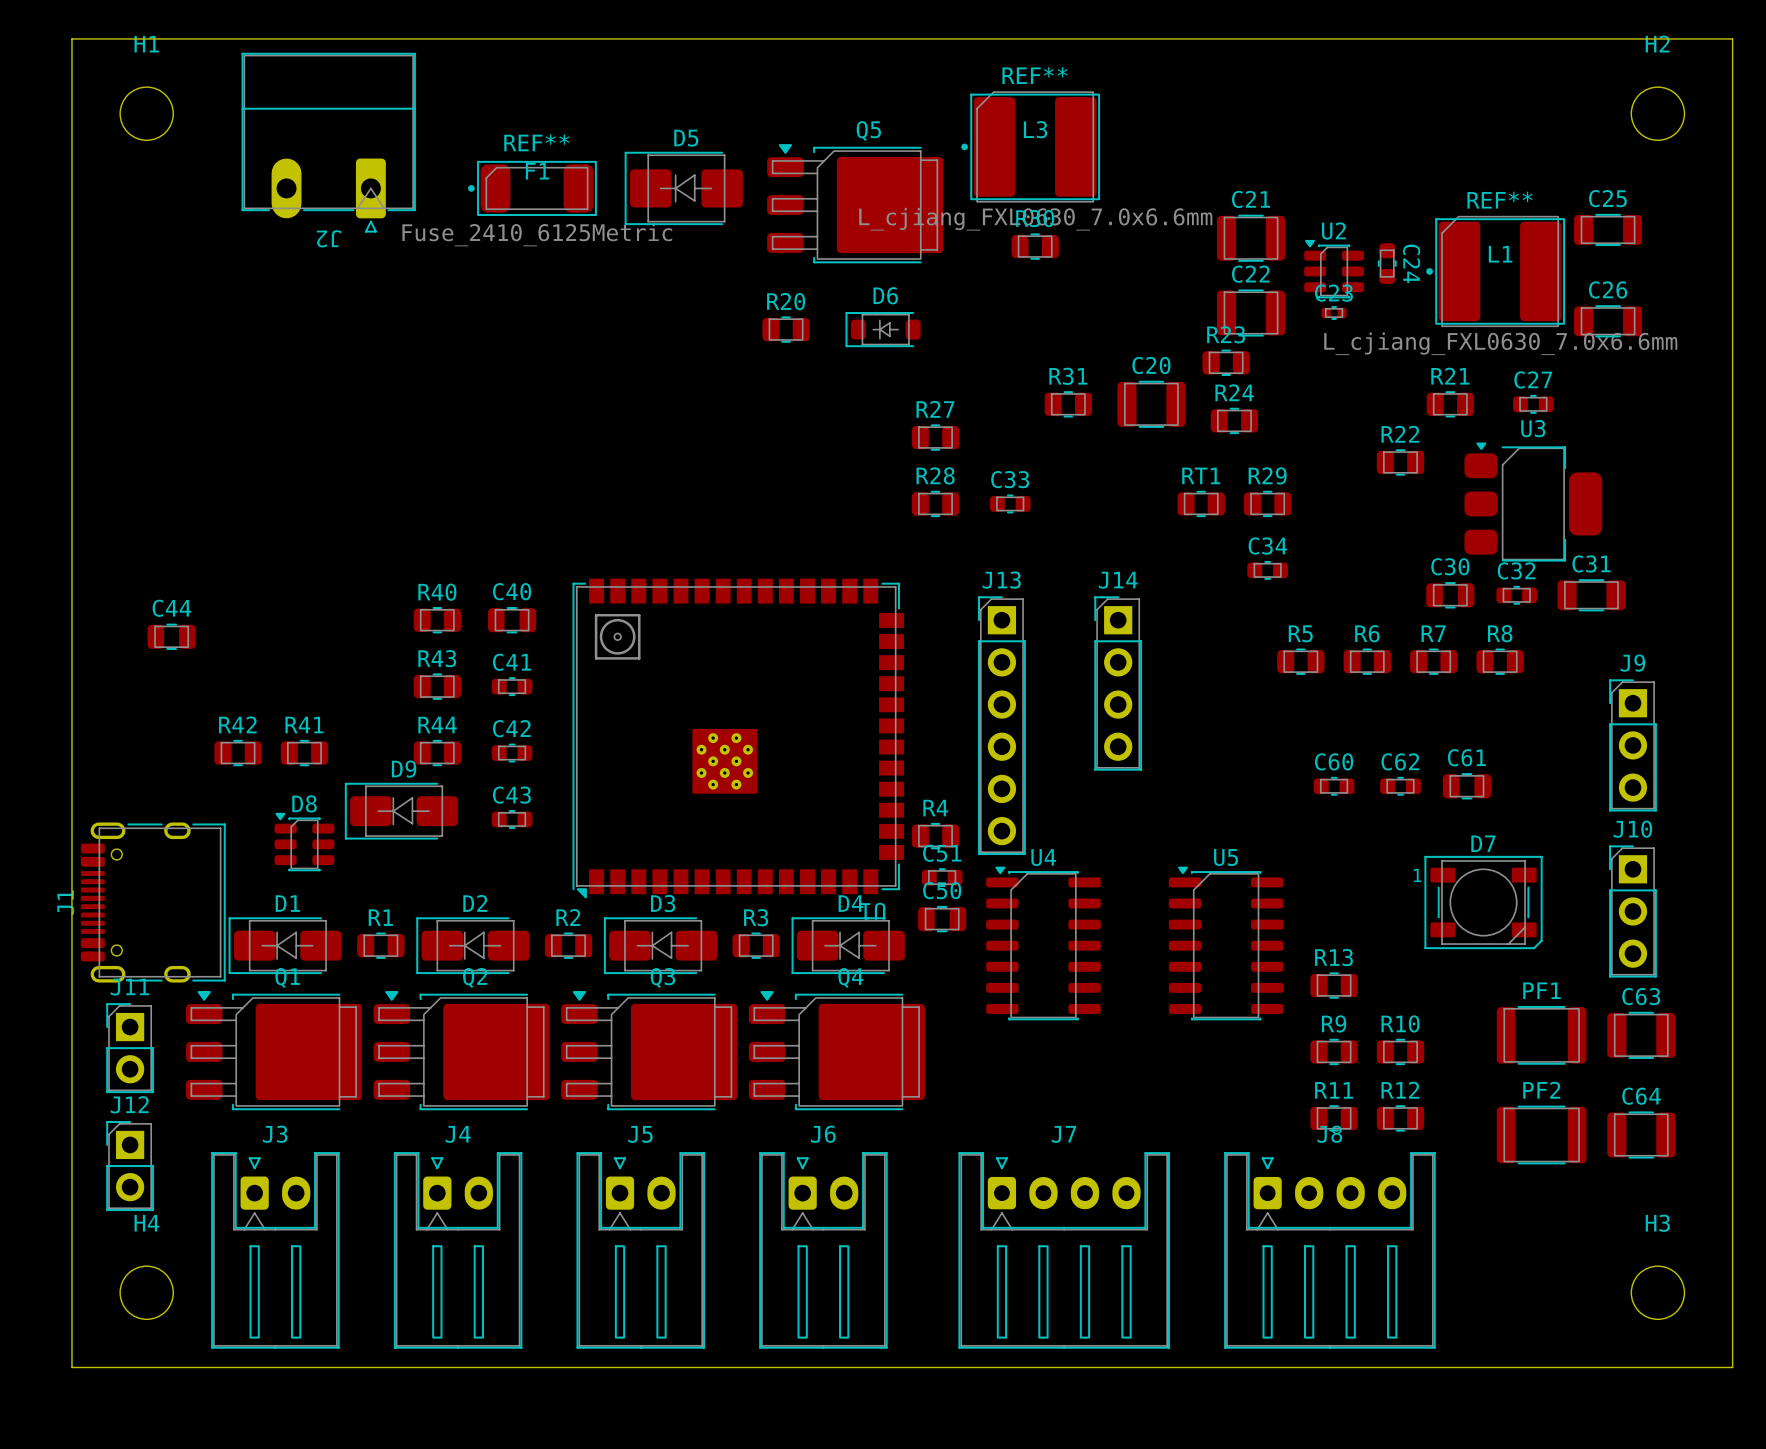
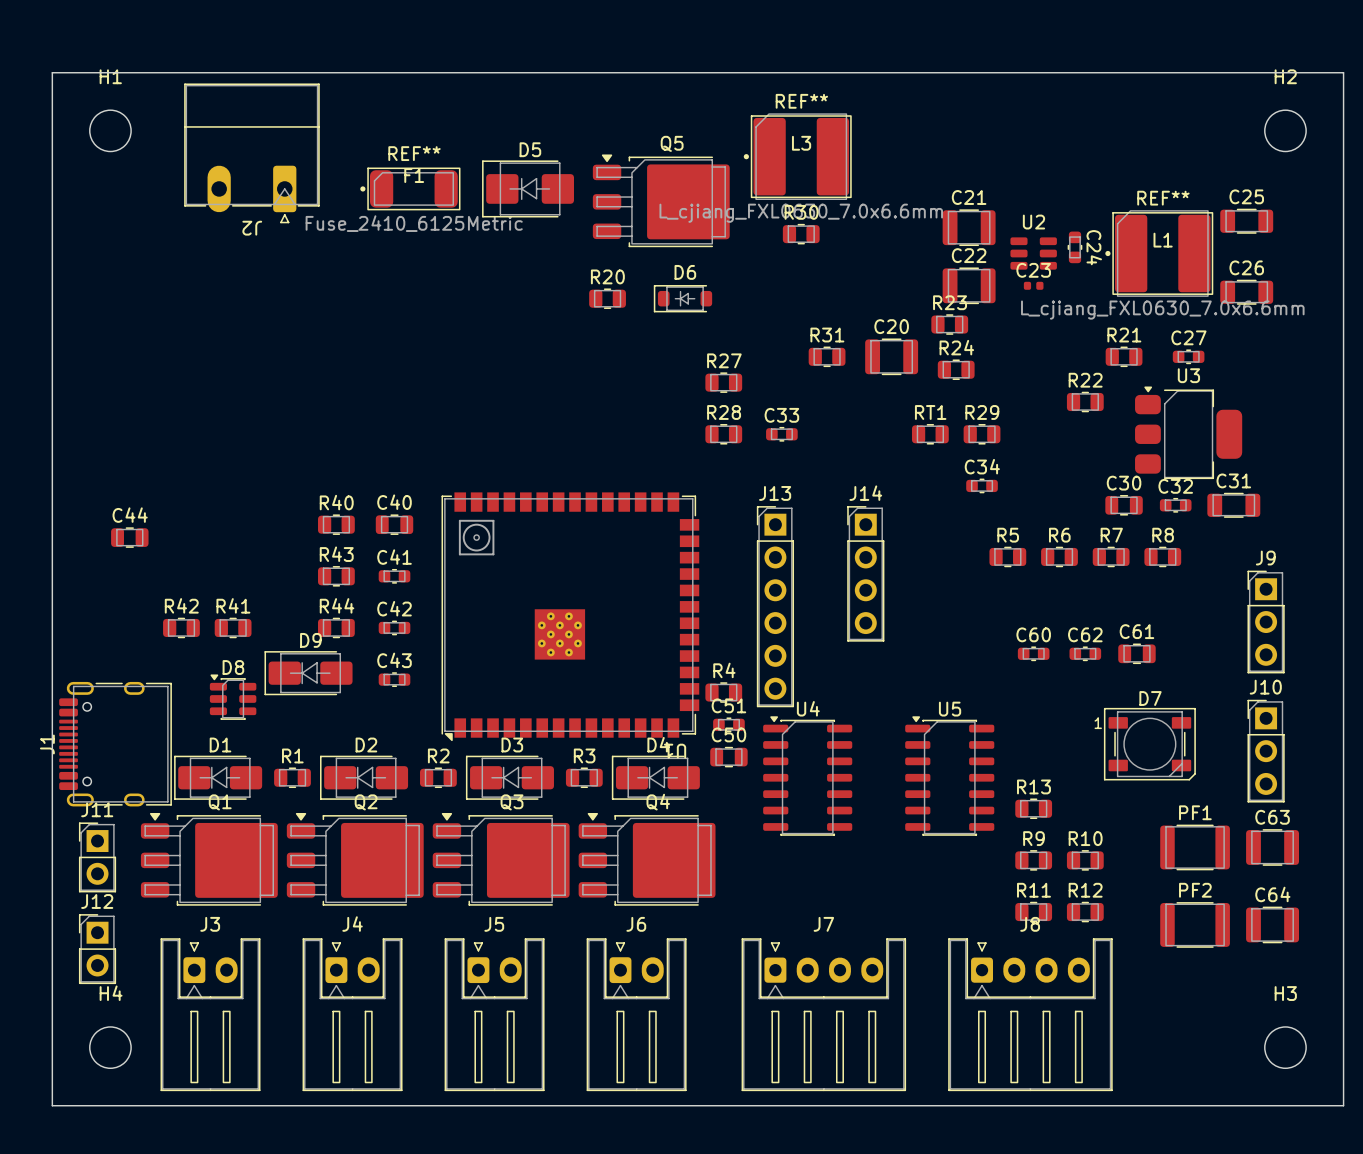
U2 footprint: [1304, 239, 1364, 299] -> [1010, 237, 1057, 270]
C23 footprint: [1321, 306, 1347, 320] -> [1023, 281, 1044, 290]

